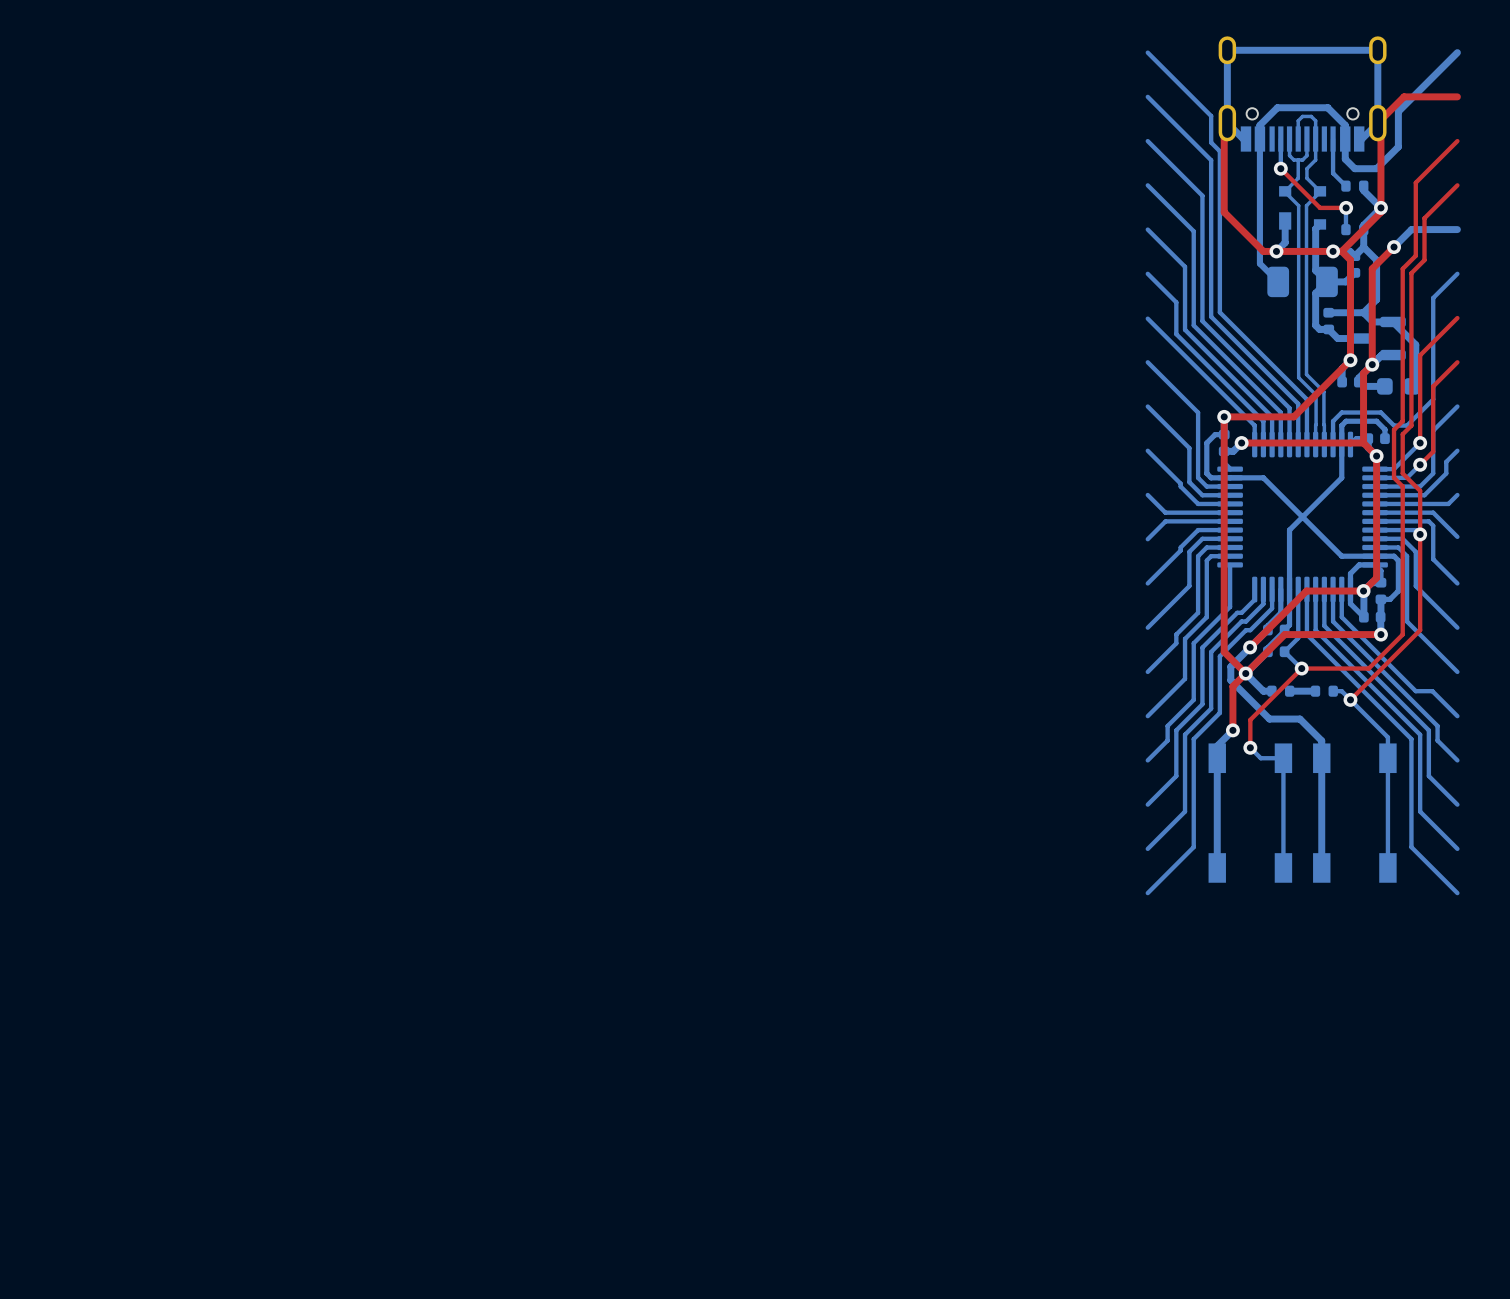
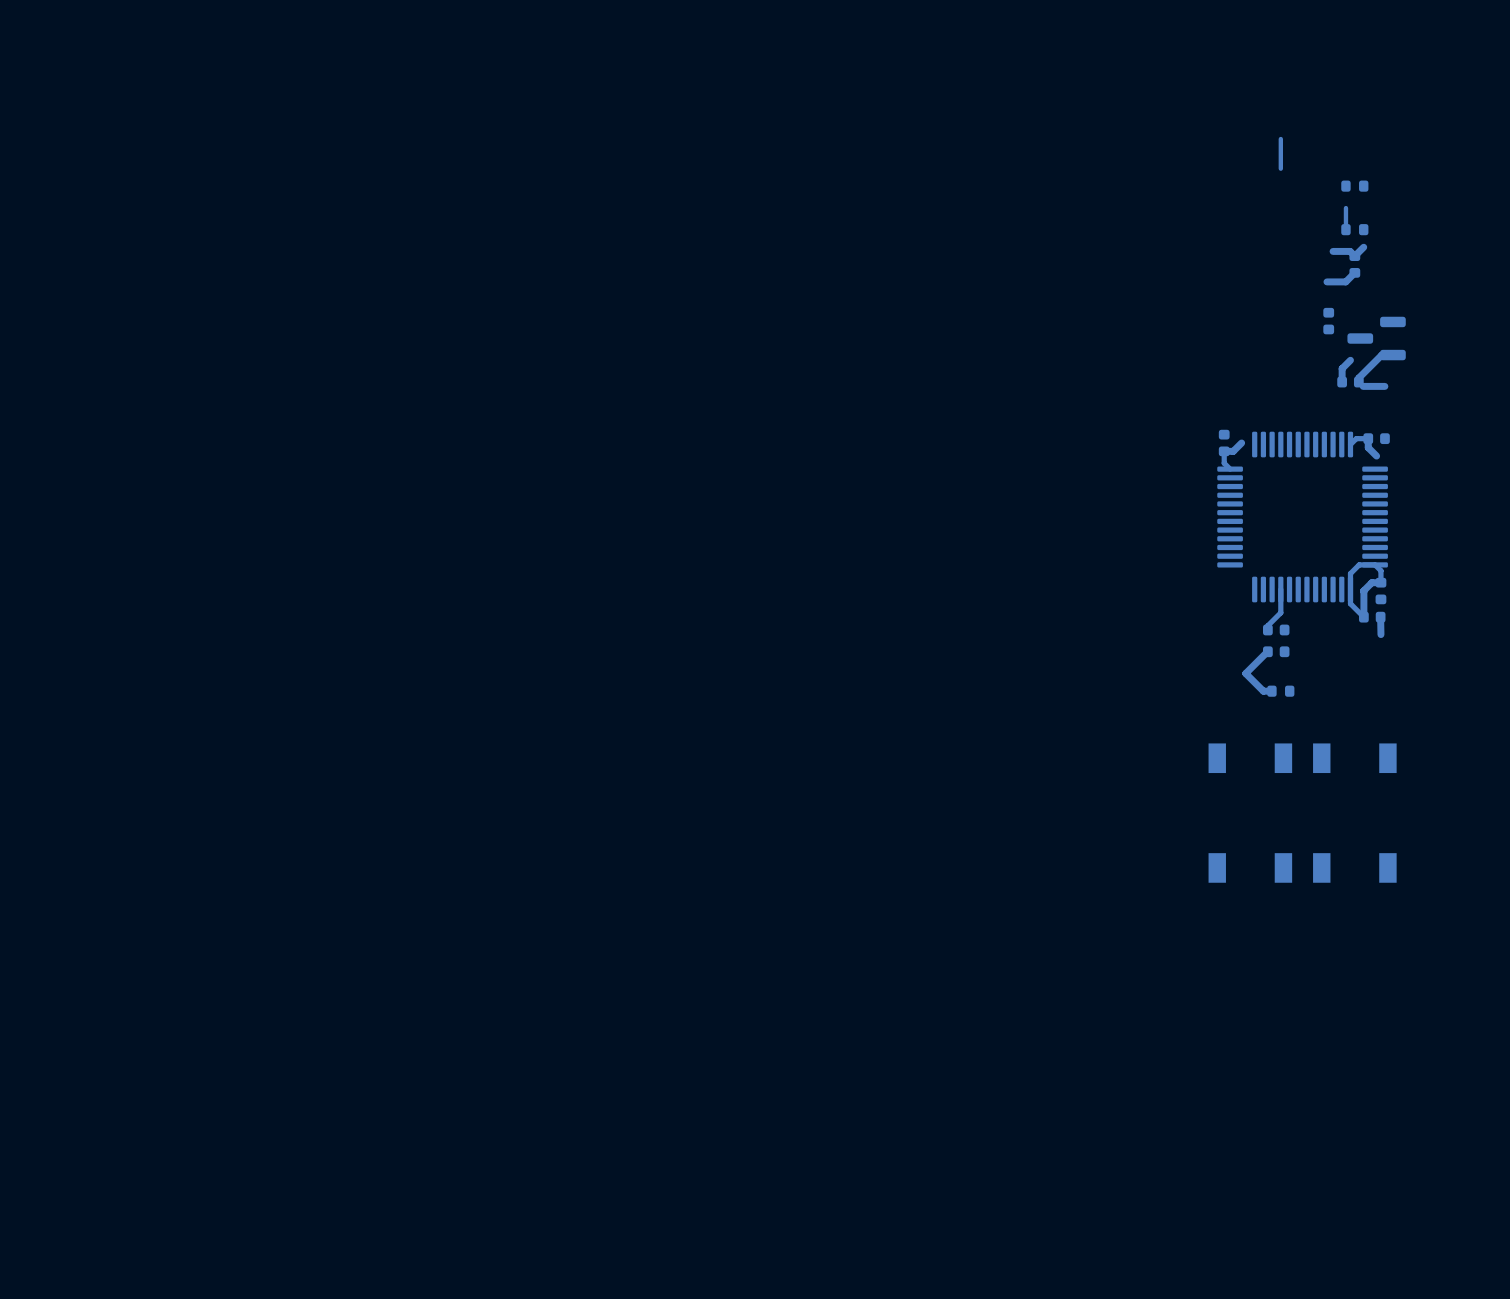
bottom track: (1147, 52) (1211, 116) (1211, 142) (1219, 151) (1219, 312) (1306, 399) (1306, 444) -> none
bottom track: (1457, 52) (1398, 111) (1398, 146) (1376, 168) (1354, 168) (1345, 159) (1345, 125) (1327, 107) (1277, 107) (1259, 125) (1259, 263) (1278, 281) -> none
part: (1302, 93) -> none
bottom track: (1147, 96) (1211, 160) (1211, 316) (1298, 403) (1298, 444) -> none
top track: (1457, 96) (1404, 96) (1377, 123) -> none
top track: (1224, 126) (1224, 212) (1263, 251) (1341, 251) -> none
top track: (1380, 126) (1380, 212) (1341, 251) -> none
bottom track: (1245, 139) (1243, 139) (1227, 123) (1227, 50) (1377, 50) (1377, 123) (1361, 139) (1359, 139) -> none
bottom track: (1289, 139) (1289, 155) (1293, 160) (1302, 160) (1306, 155) (1306, 139) -> none
bottom track: (1298, 139) (1298, 120) (1302, 116) (1311, 116) (1315, 120) (1315, 160) (1306, 168) (1306, 178) (1320, 191) -> none
bottom track: (1333, 139) (1333, 173) (1345, 186) -> none
bottom track: (1147, 141) (1202, 195) (1202, 321) (1289, 408) (1289, 444) -> none
top track: (1457, 141) (1415, 182) (1415, 255) (1402, 268) (1402, 421) (1394, 429) (1394, 477) (1402, 486) (1402, 634) (1368, 668) (1301, 668) (1250, 719) (1250, 747) -> none
bottom track: (1298, 160) (1298, 178) (1285, 191) -> none
top track: (1280, 168) (1320, 207) (1346, 207) -> none
via: (1280, 168) -> none
bottom track: (1147, 185) (1193, 231) (1193, 325) (1280, 412) (1280, 444) -> none
top track: (1457, 185) (1424, 218) (1424, 260) (1411, 273) (1411, 425) (1402, 434) (1402, 473) (1420, 490) (1420, 630) (1350, 699) -> none
bottom track: (1363, 186) (1363, 190) (1380, 207) (1363, 225) (1363, 247) (1376, 260) (1376, 299) (1363, 312) -> none
bottom track: (1285, 192) (1298, 205) (1298, 377) (1316, 395) (1315, 444) -> none
bottom track: (1320, 192) (1306, 205) (1306, 374) (1323, 391) (1324, 444) -> none
part: (1302, 207) -> none
via: (1346, 207) -> none
via: (1380, 207) -> none
bottom track: (1285, 220) (1285, 242) (1276, 251) -> none
bottom track: (1320, 224) (1315, 228) (1315, 270) (1326, 281) (1315, 293) (1315, 325) (1319, 329) (1328, 329) (1337, 338) (1360, 338) -> none
bottom track: (1147, 229) (1185, 266) (1185, 329) (1272, 416) (1272, 444) -> none
bottom track: (1457, 229) (1411, 229) (1394, 247) -> none
top track: (1394, 247) (1372, 268) (1372, 364) (1363, 373) (1363, 443) -> none
via: (1394, 247) -> none
via: (1276, 251) -> none
via: (1333, 251) -> none
top track: (1341, 251) (1350, 260) (1350, 360) (1293, 416) (1224, 416) (1224, 651) (1245, 673) -> none
bottom track: (1147, 273) (1176, 302) (1176, 334) (1263, 421) (1263, 444) -> none
bottom track: (1457, 273) (1433, 298) (1433, 399) (1407, 425) (1394, 425) (1380, 412) (1341, 412) (1333, 421) (1333, 444) -> none
part: (1302, 281) -> none
bottom track: (1328, 312) (1363, 312) -> none
bottom track: (1363, 312) (1372, 321) (1392, 321) (1415, 344) (1415, 382) -> none
bottom track: (1147, 318) (1254, 425) (1254, 444) -> none
top track: (1457, 318) (1420, 355) (1420, 443) -> none
via: (1350, 360) -> none
bottom track: (1147, 362) (1198, 412) (1198, 477) (1206, 486) (1230, 486) -> none
top track: (1457, 362) (1433, 386) (1433, 451) (1420, 464) -> none
via: (1372, 364) -> none
part: (1398, 386) -> none
bottom track: (1147, 406) (1189, 448) (1189, 482) (1202, 495) (1230, 495) -> none
bottom track: (1457, 406) (1433, 430) (1433, 473) (1420, 486) (1375, 486) -> none
bottom track: (1224, 416) (1224, 434) (1215, 434) (1206, 443) (1206, 473) (1211, 477) (1263, 477) (1341, 556) (1394, 556) (1398, 560) (1398, 591) (1390, 599) (1380, 599) (1380, 616) -> none
via: (1224, 416) -> none
bottom track: (1384, 438) (1384, 429) (1376, 421) (1346, 421) (1341, 425) (1341, 477) (1289, 530) (1289, 625) (1267, 648) (1267, 651) -> none
top track: (1241, 443) (1363, 443) -> none
via: (1241, 443) -> none
top track: (1363, 443) (1376, 456) (1376, 577) (1363, 591) (1306, 591) (1250, 647) -> none
bottom track: (1420, 443) (1394, 469) (1375, 469) -> none
via: (1420, 443) -> none
bottom track: (1147, 450) (1198, 503) (1230, 503) -> none
bottom track: (1457, 450) (1446, 461) (1446, 473) (1424, 495) (1375, 495) -> none
via: (1376, 456) -> none
bottom track: (1420, 464) (1407, 477) (1375, 477) -> none
via: (1420, 464) -> none
bottom track: (1147, 494) (1165, 512) (1230, 512) -> none
bottom track: (1457, 494) (1448, 503) (1375, 503) -> none
bottom track: (1375, 512) (1433, 512) (1457, 536) -> none
bottom track: (1230, 521) (1165, 521) (1147, 539) -> none
bottom track: (1375, 521) (1428, 521) (1433, 525) (1433, 559) (1457, 583) -> none
bottom track: (1230, 530) (1198, 530) (1147, 583) -> none
bottom track: (1375, 530) (1415, 530) (1420, 534) -> none
via: (1420, 534) -> none
bottom track: (1230, 538) (1202, 538) (1189, 551) (1189, 586) (1147, 627) -> none
bottom track: (1375, 538) (1402, 538) (1415, 551) (1415, 586) (1457, 627) -> none
bottom track: (1230, 547) (1206, 547) (1198, 556) (1198, 612) (1176, 634) (1176, 643) (1147, 671) -> none
bottom track: (1375, 547) (1398, 547) (1407, 556) (1407, 621) (1457, 671) -> none
bottom track: (1230, 556) (1211, 556) (1206, 560) (1206, 617) (1185, 638) (1185, 678) (1147, 716) -> none
bottom track: (1230, 564) (1230, 606) (1193, 643) (1193, 699) (1167, 726) (1167, 740) (1147, 760) -> none
bottom track: (1263, 589) (1263, 604) (1245, 621) (1241, 621) (1211, 651) (1211, 708) (1185, 734) (1185, 811) (1147, 848) -> none
bottom track: (1272, 589) (1272, 608) (1250, 630) (1245, 630) (1219, 656) (1219, 712) (1193, 739) (1193, 847) (1147, 893) -> none
bottom track: (1298, 589) (1298, 638) (1284, 651) (1301, 668) -> none
bottom track: (1306, 589) (1306, 634) (1411, 739) (1411, 847) (1457, 893) -> none
bottom track: (1315, 589) (1315, 630) (1420, 734) (1420, 811) (1457, 848) -> none
bottom track: (1324, 589) (1324, 625) (1428, 730) (1428, 776) (1457, 804) -> none
bottom track: (1333, 589) (1333, 621) (1437, 726) (1437, 740) (1457, 760) -> none
bottom track: (1341, 589) (1341, 617) (1415, 691) (1432, 691) (1457, 716) -> none
via: (1363, 591) -> none
bottom track: (1254, 599) (1241, 612) (1237, 612) (1202, 647) (1202, 704) (1176, 730) (1176, 776) (1147, 804) -> none
bottom track: (1267, 629) (1230, 666) (1230, 680) (1269, 719) (1299, 719) (1321, 740) (1321, 867) -> none
top track: (1380, 634) (1284, 634) (1232, 686) (1232, 730) -> none
via: (1380, 634) -> none
via: (1250, 647) -> none
via: (1301, 668) -> none
via: (1245, 673) -> none
bottom track: (1289, 691) (1315, 691) -> none
part: (1324, 691) -> none
bottom track: (1333, 691) (1341, 691) (1387, 737) (1387, 867) -> none
via: (1350, 699) -> none
bottom track: (1232, 730) (1217, 746) (1217, 867) -> none
via: (1232, 730) -> none
bottom track: (1250, 747) (1260, 758) (1283, 758) (1283, 867) -> none
via: (1250, 747) -> none

